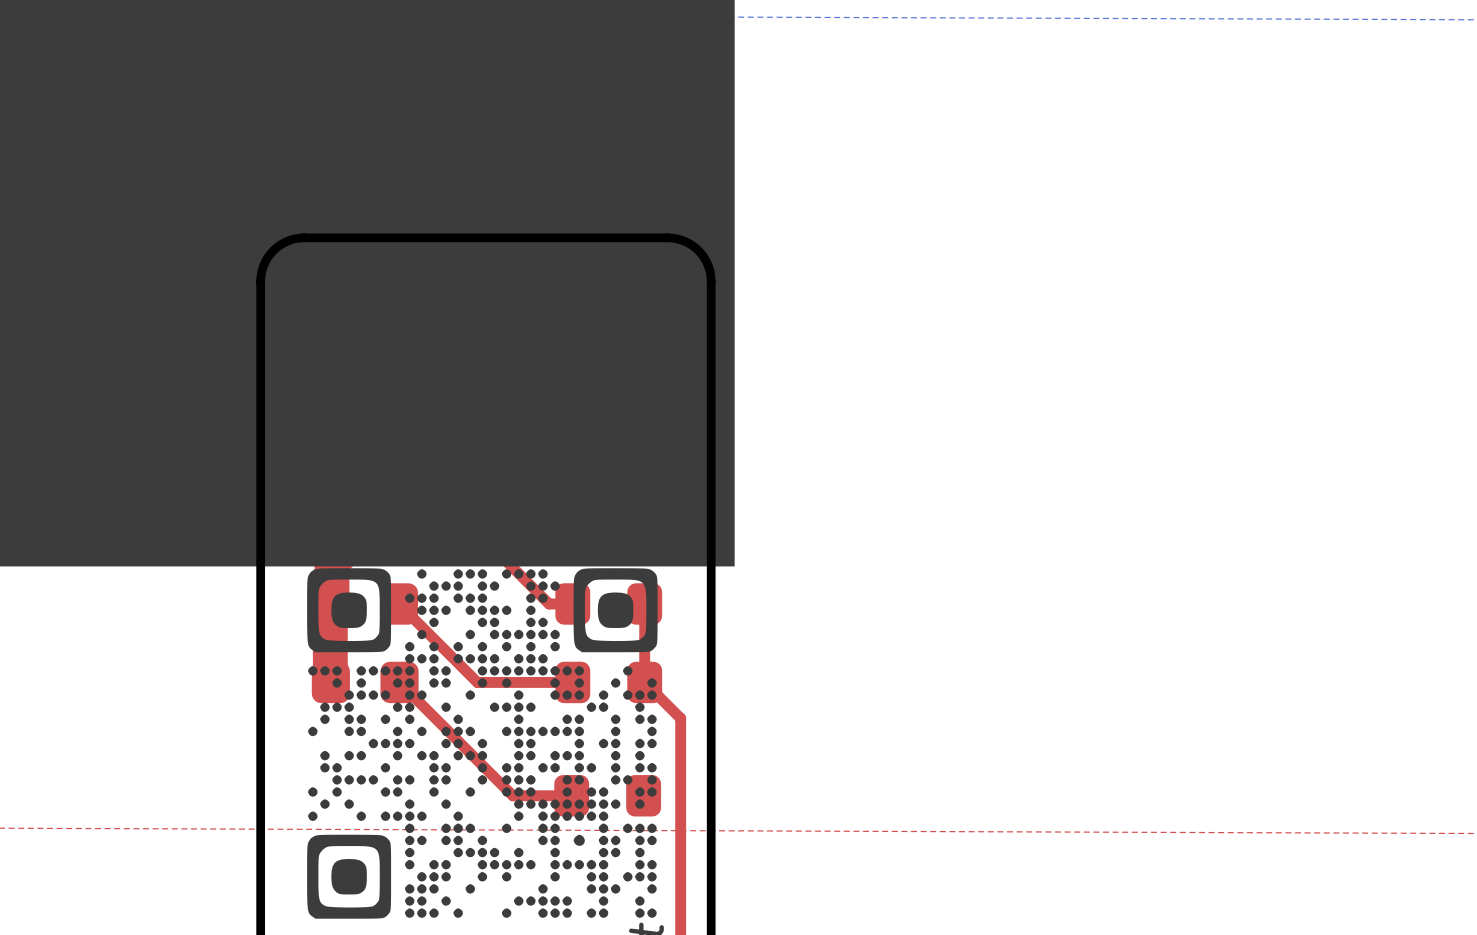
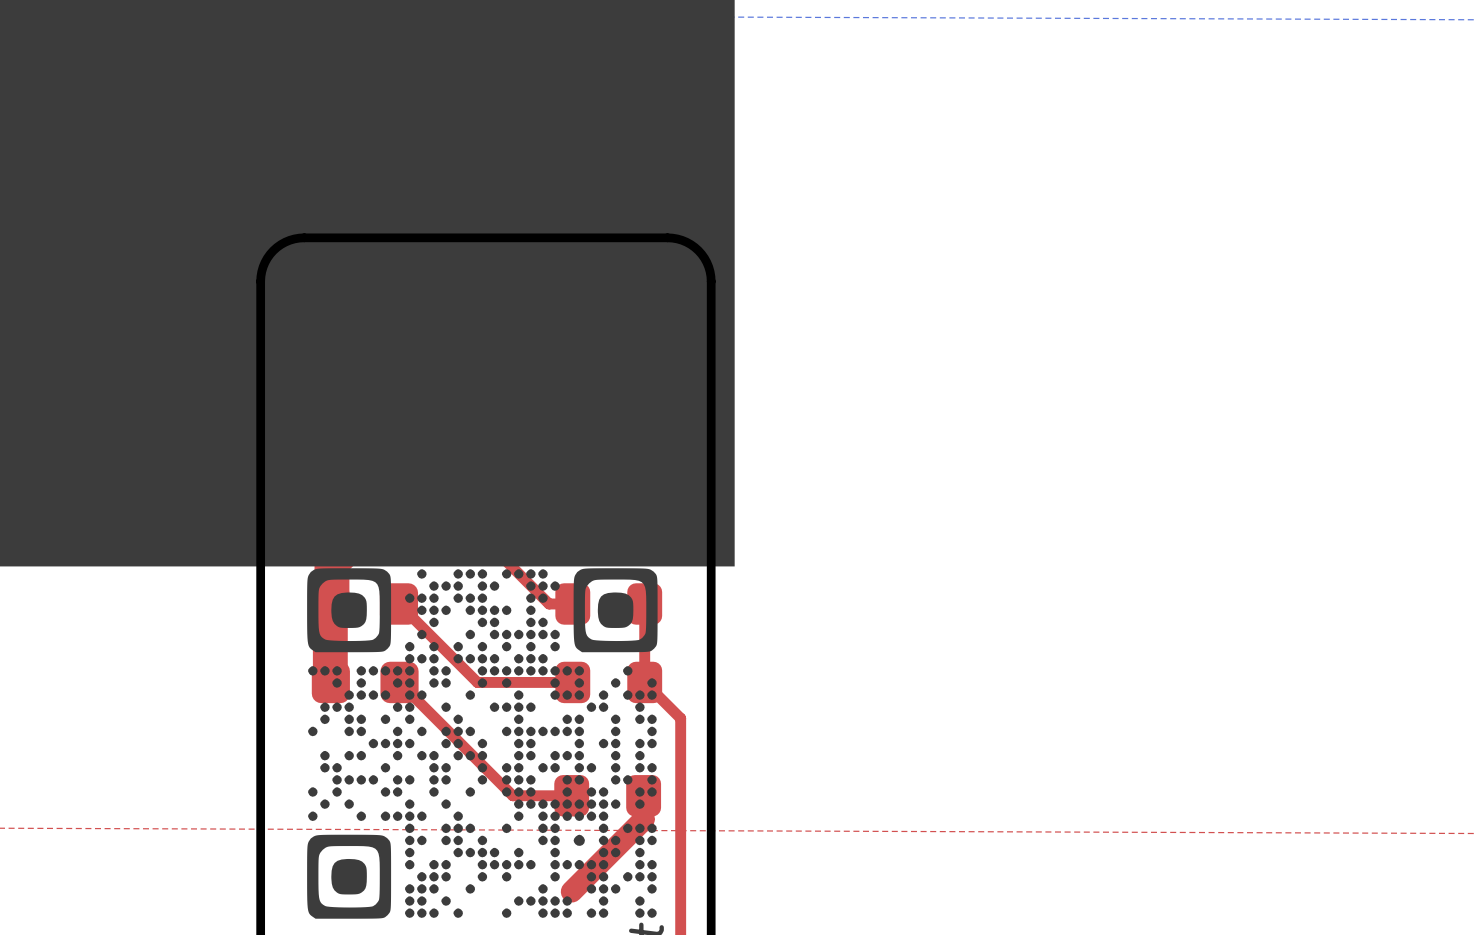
top track: none -> (643, 795) (643, 819) (571, 891)

